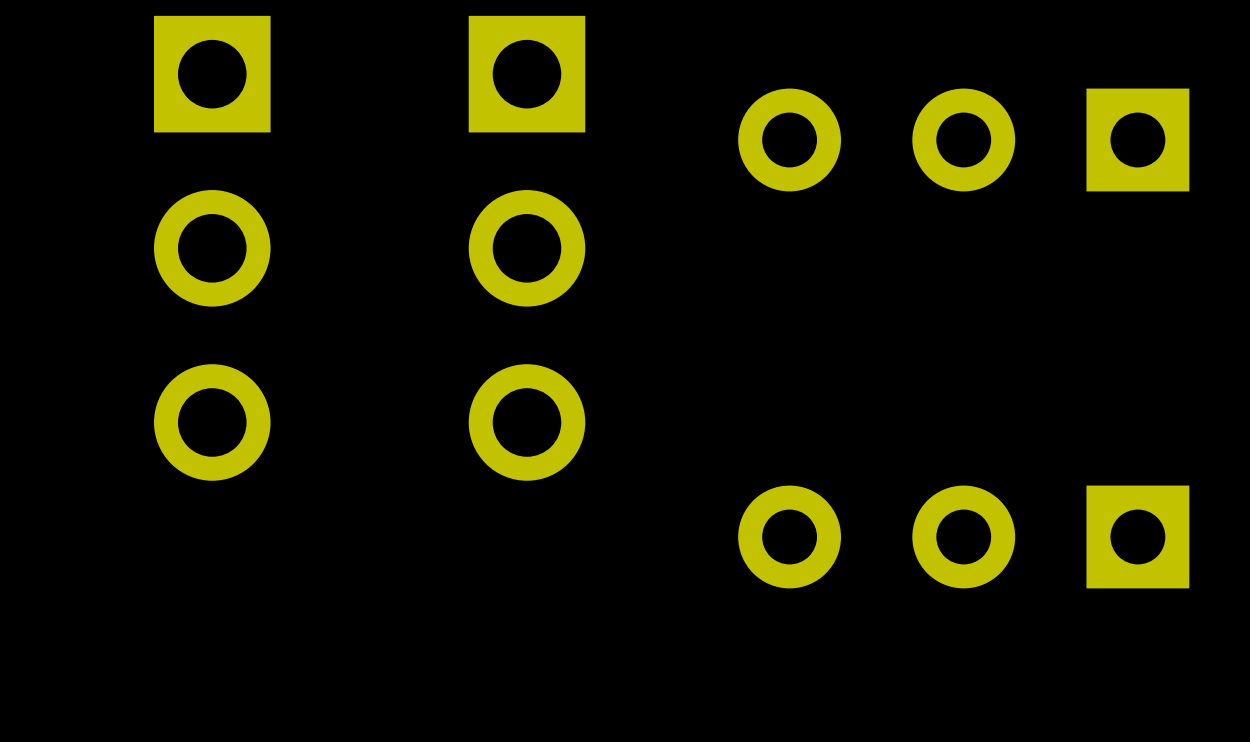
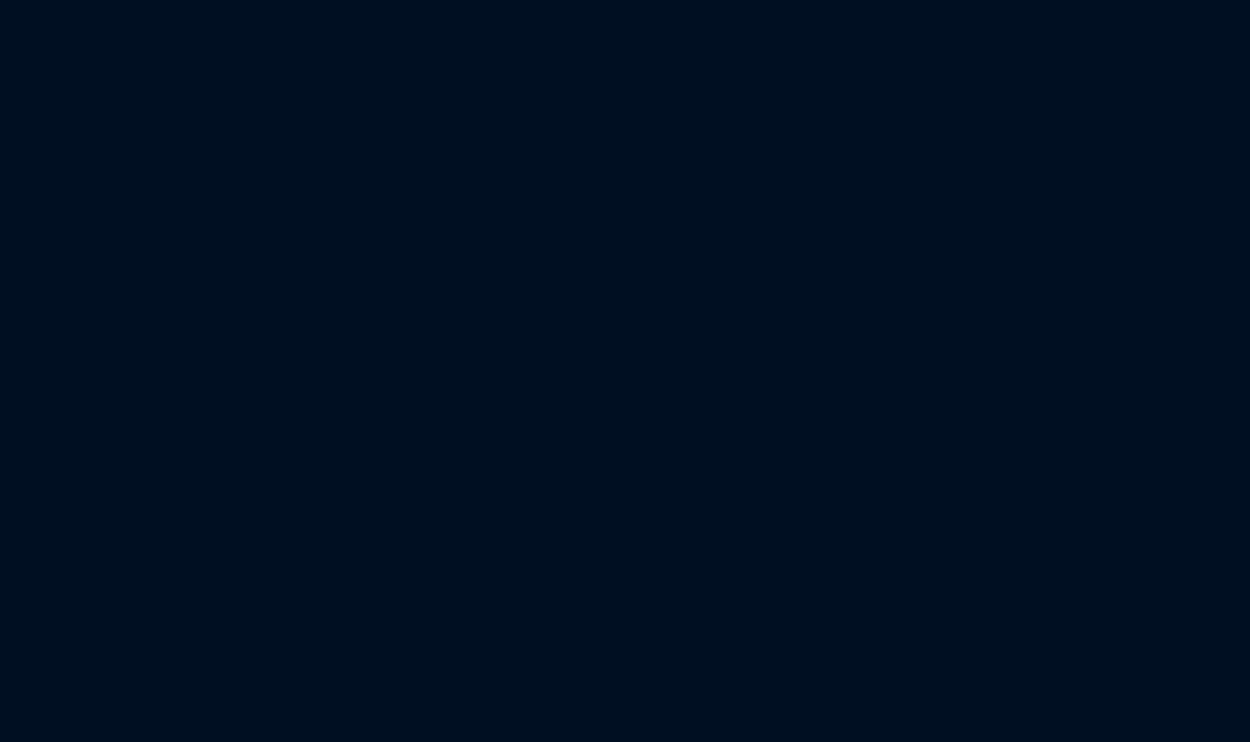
part: (963, 139) -> none
part: (212, 248) -> none
part: (526, 248) -> none
part: (963, 536) -> none

